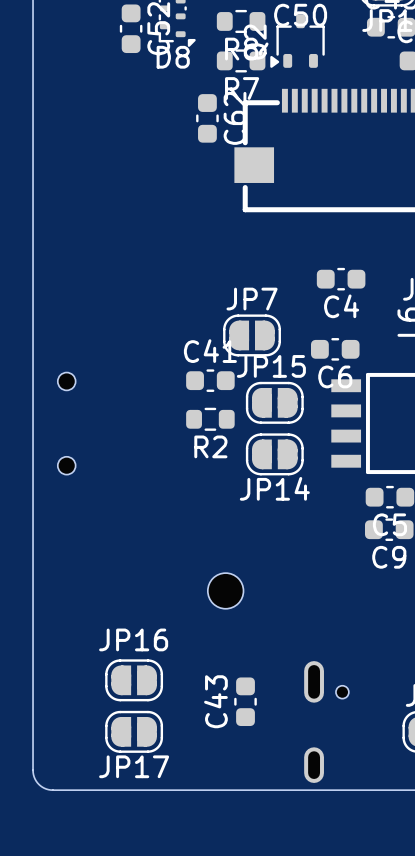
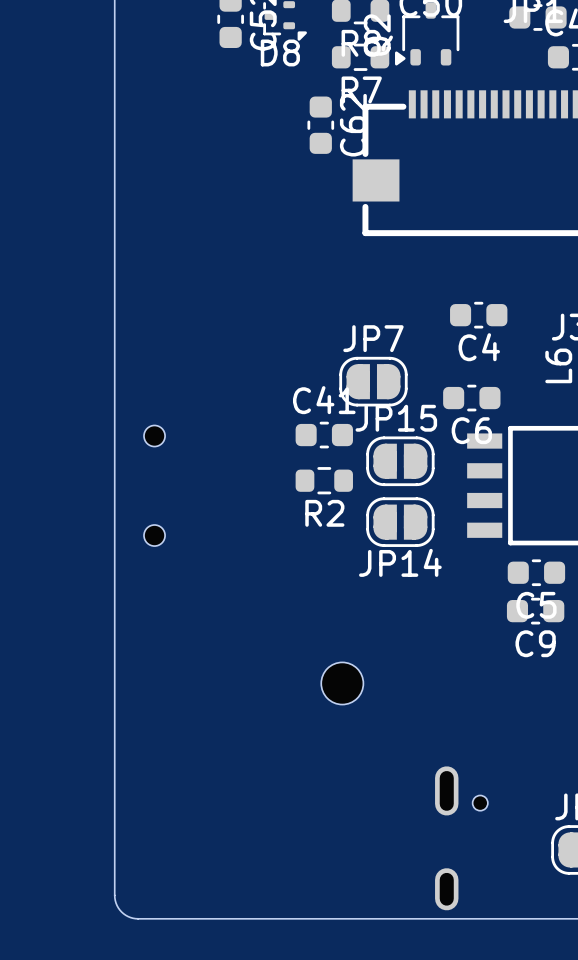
JP16: (134, 680) -> none
C43: (245, 701) -> none
JP17: (134, 731) -> none

